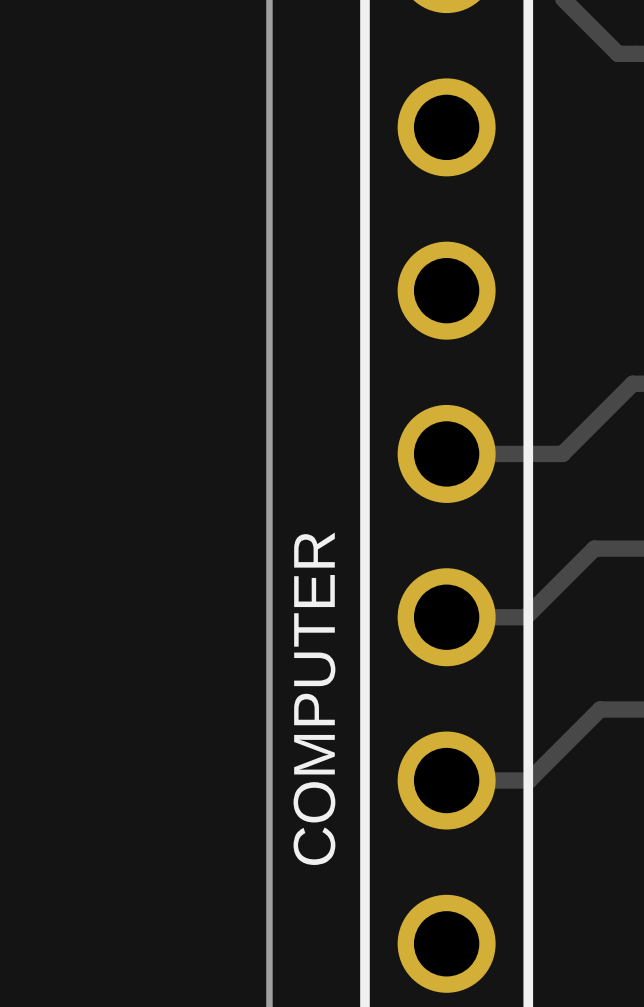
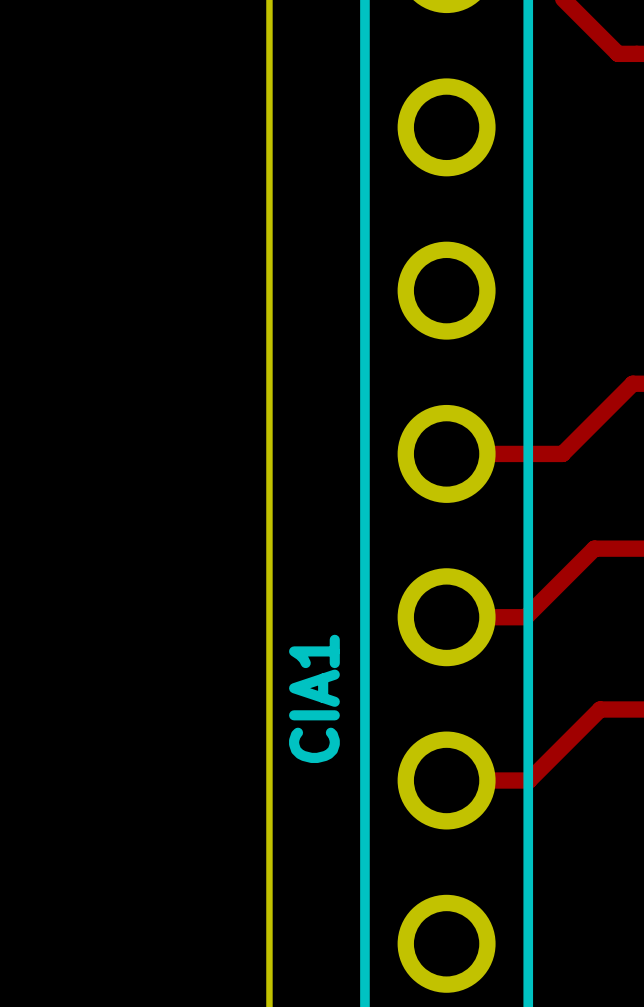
part value: COMPUTER (314, 698) -> CIA1 (314, 698)

